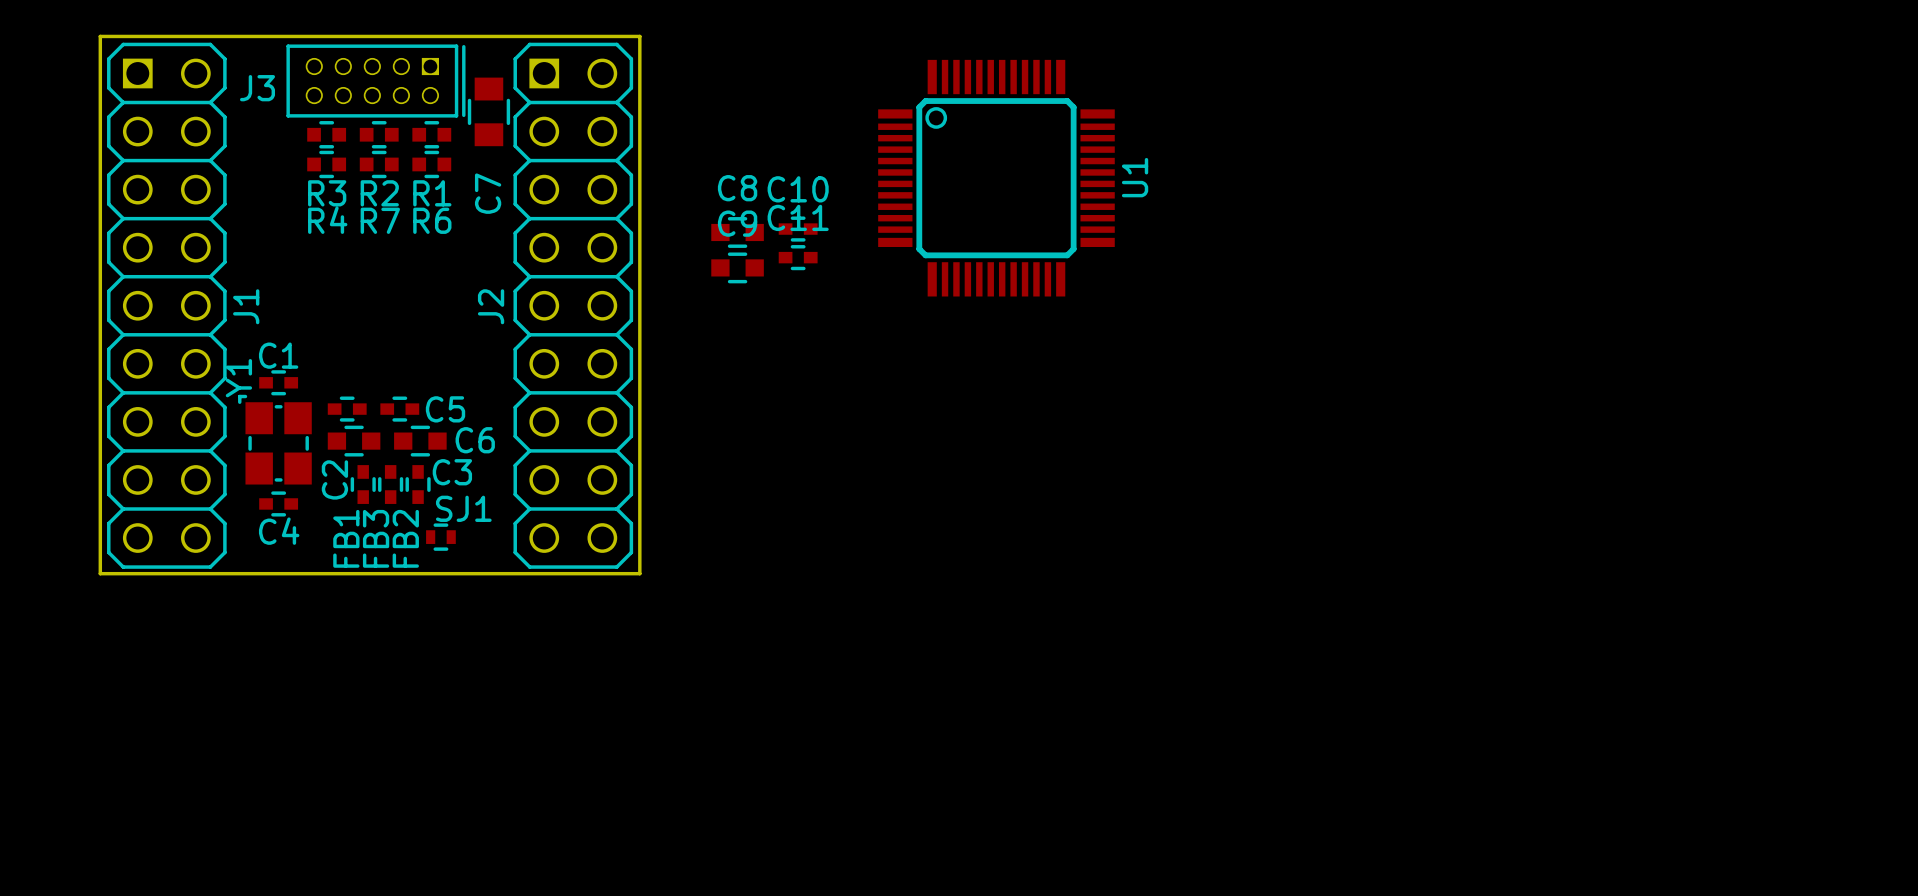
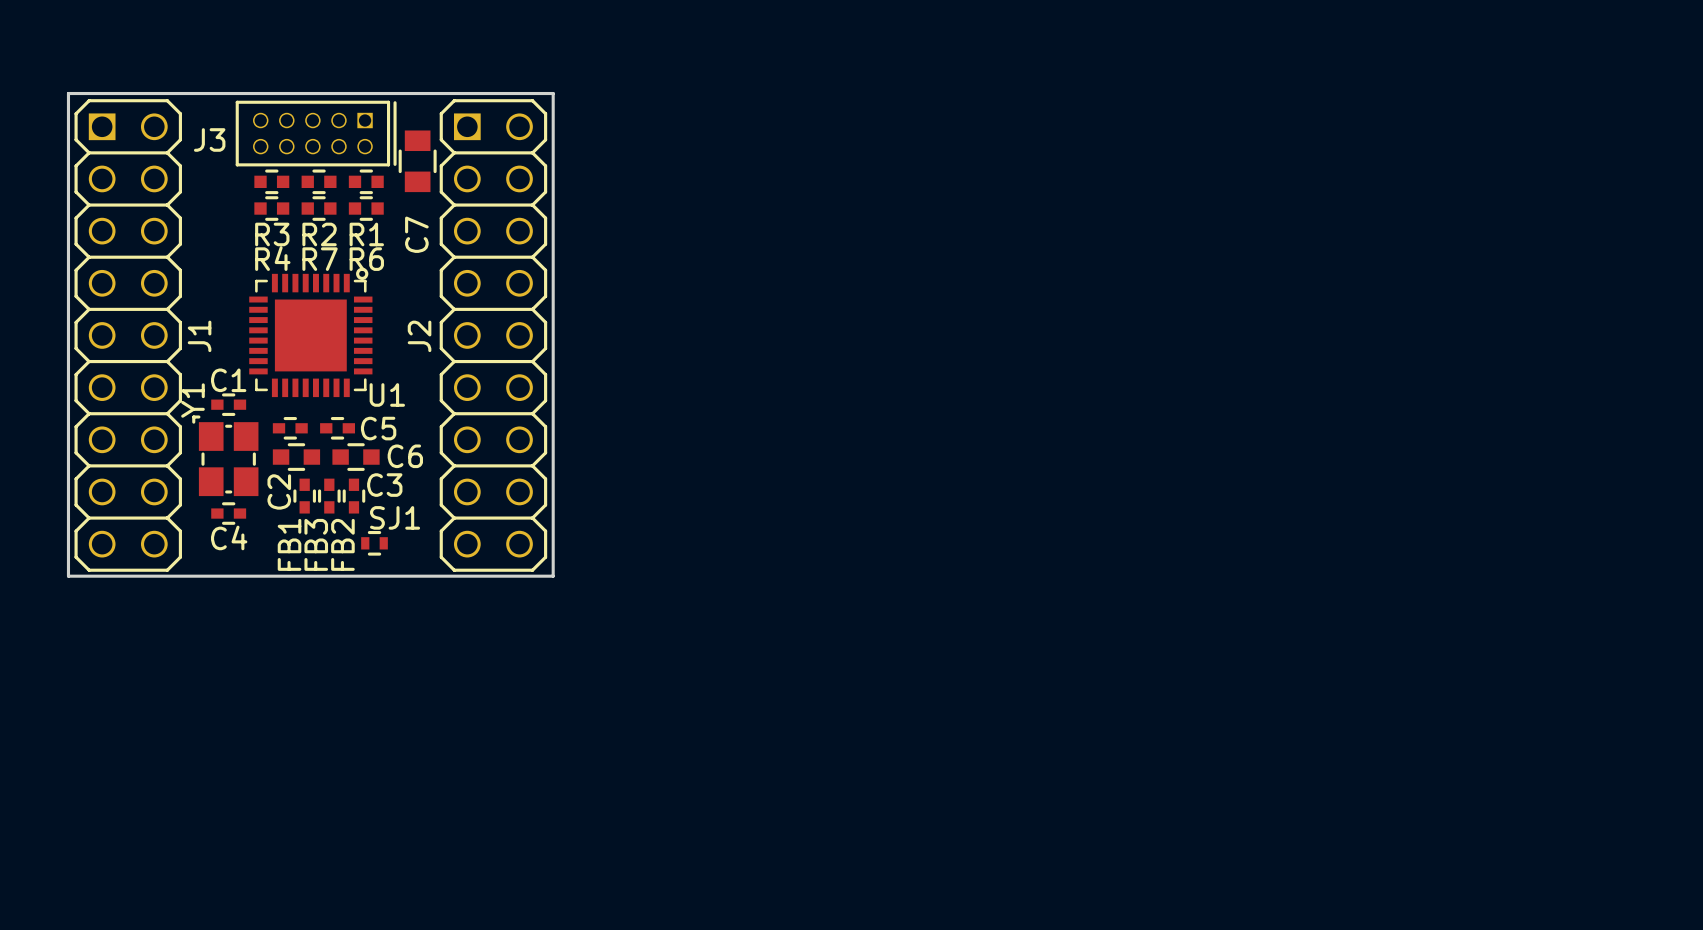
U1 footprint: [878, 59, 1115, 297] -> [249, 267, 373, 398]
U1 name position: U1 (1135, 177) -> U1 (387, 394)
C10: (798, 229) -> none
C8: (737, 232) -> none
C11: (798, 257) -> none
C9: (737, 267) -> none

